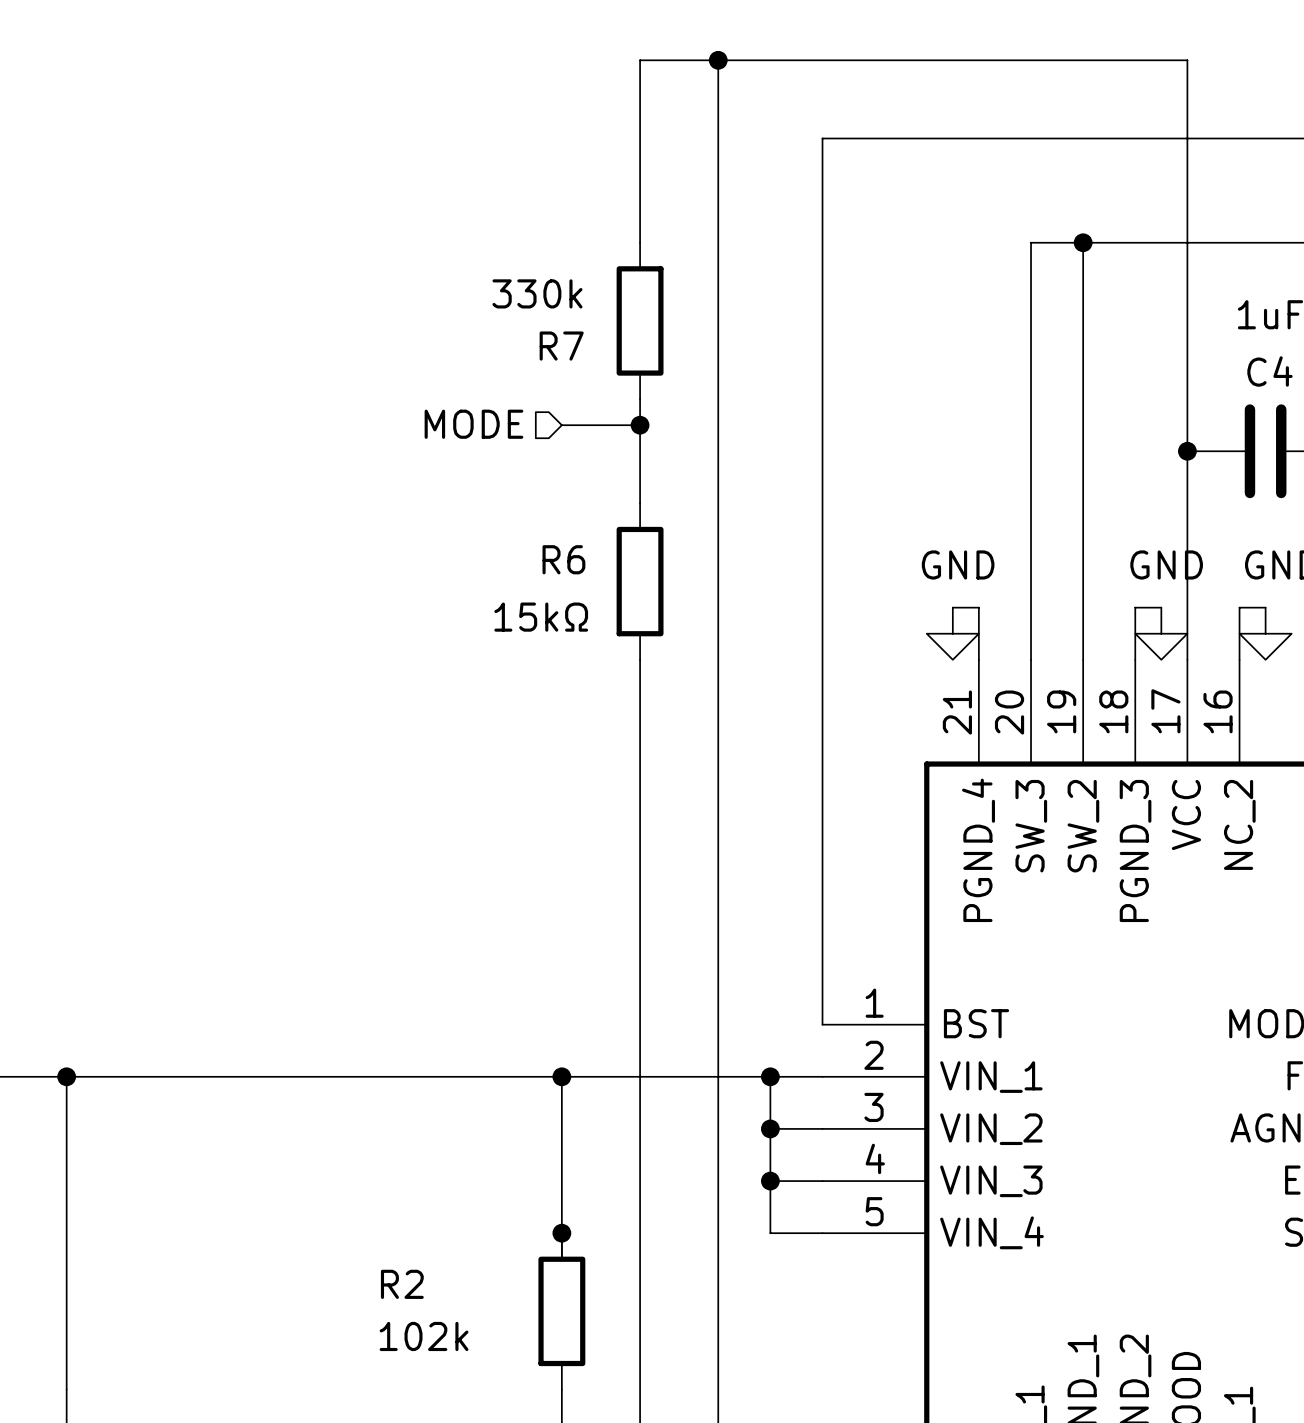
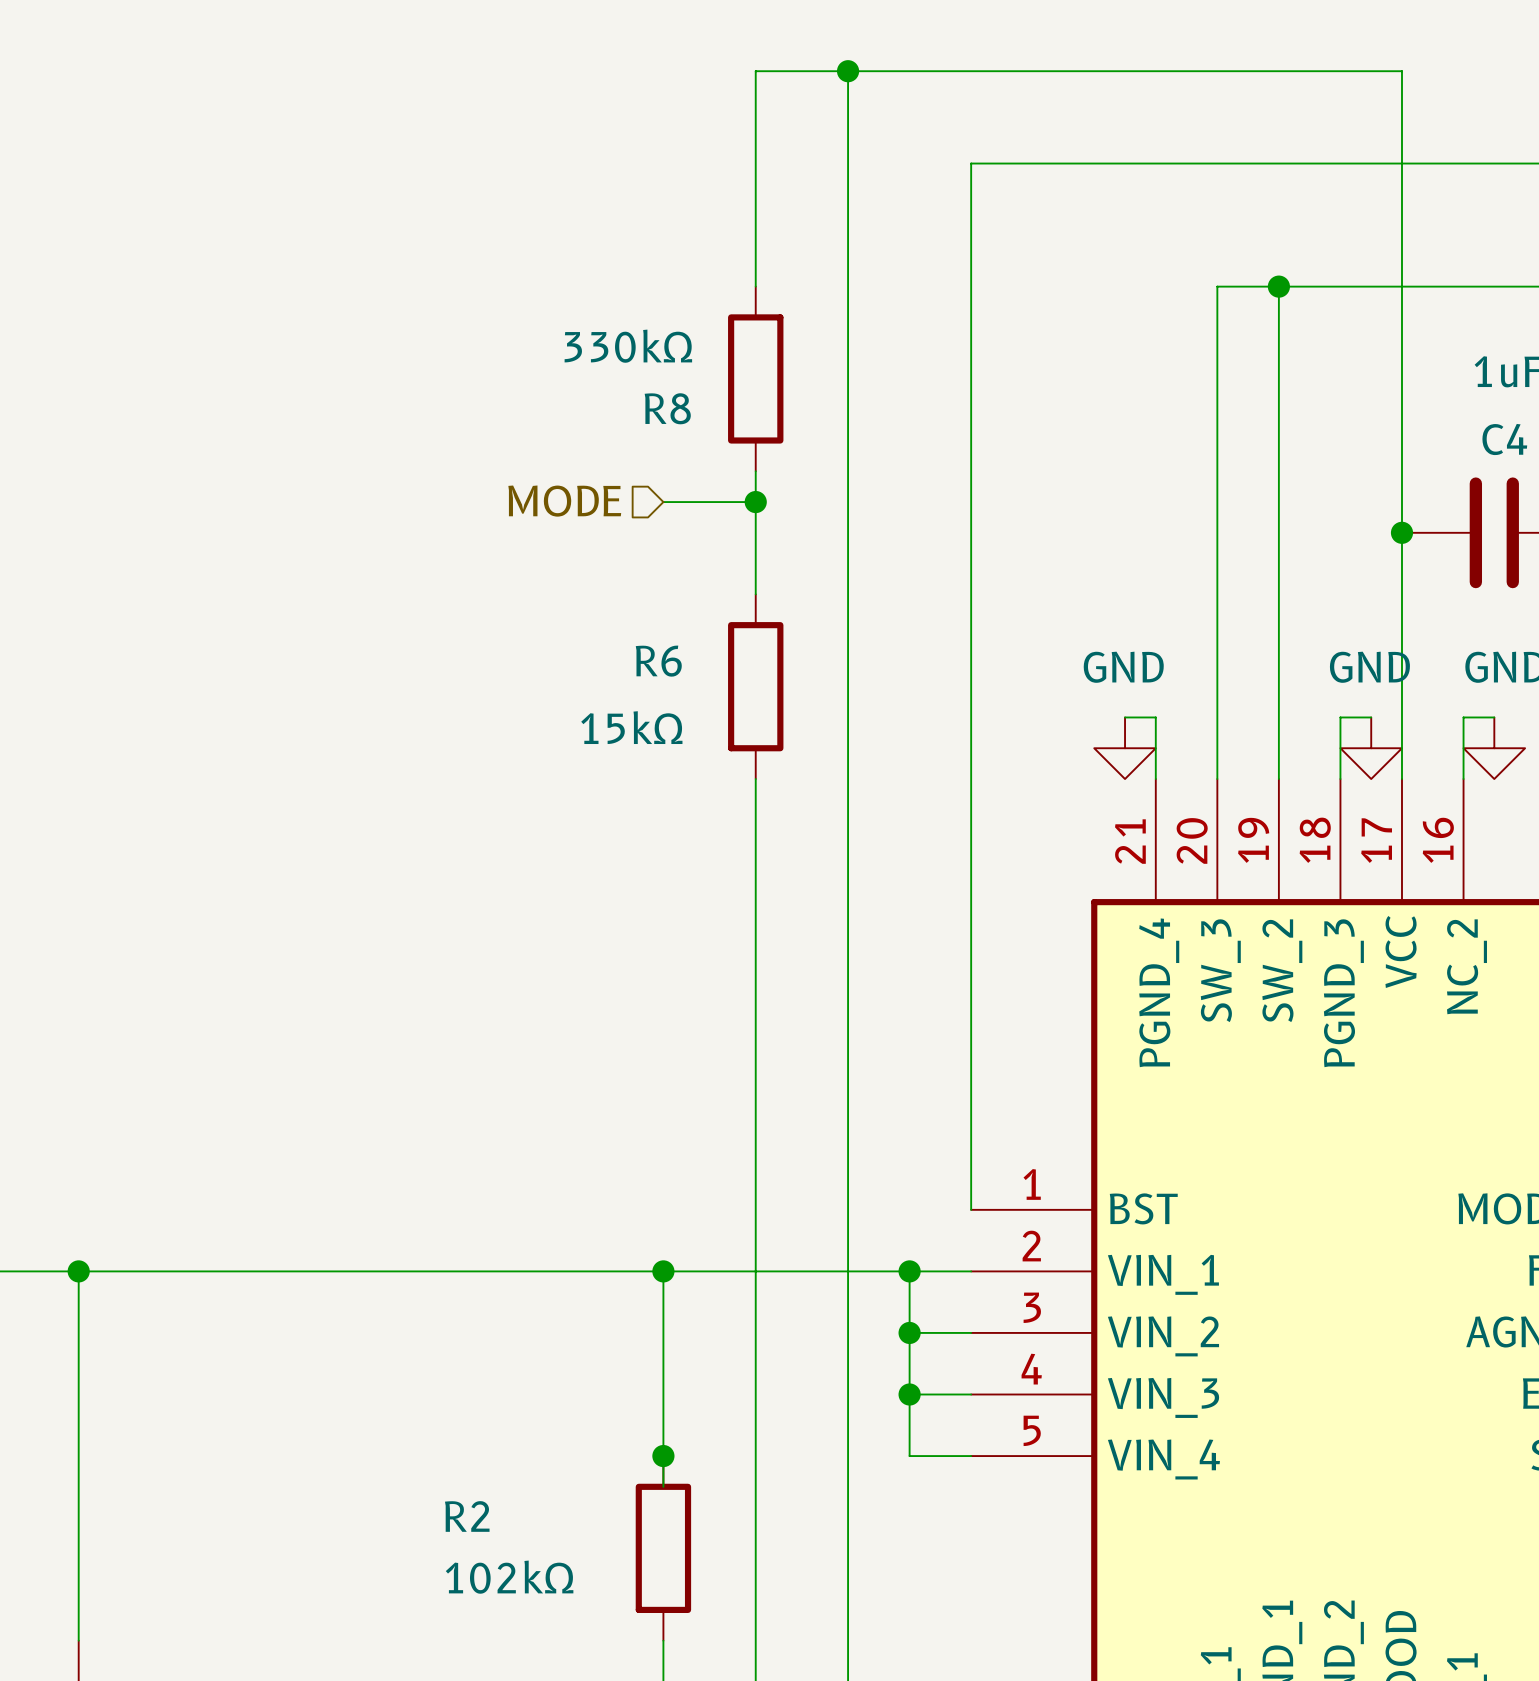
R7 value: 330k (537, 293) -> 330kΩ (628, 346)
R7 name: R7 (561, 346) -> R8 (667, 408)
R2 value: 102k (424, 1336) -> 102kΩ (509, 1577)

